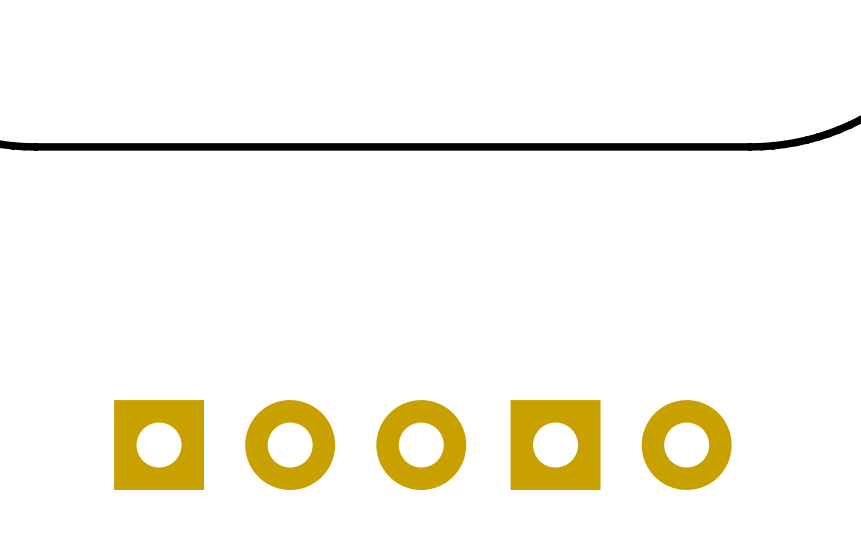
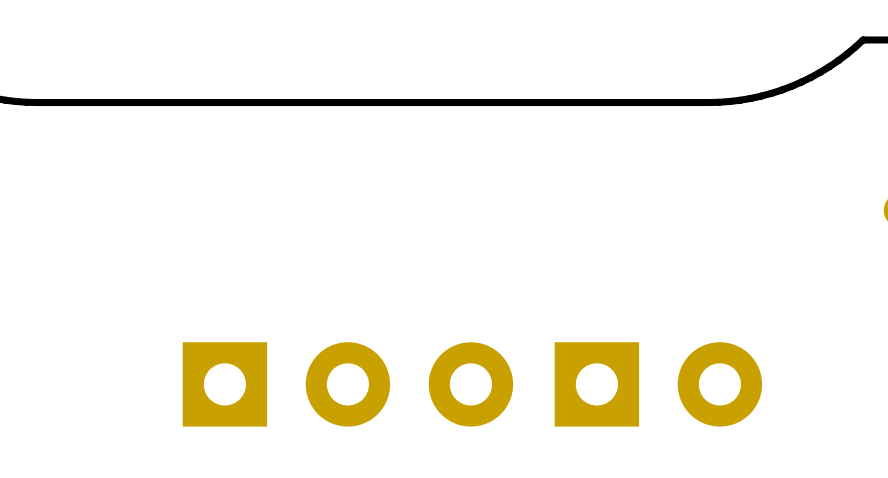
part position: (290, 445) -> (347, 384)
part position: (621, 445) -> (658, 384)

